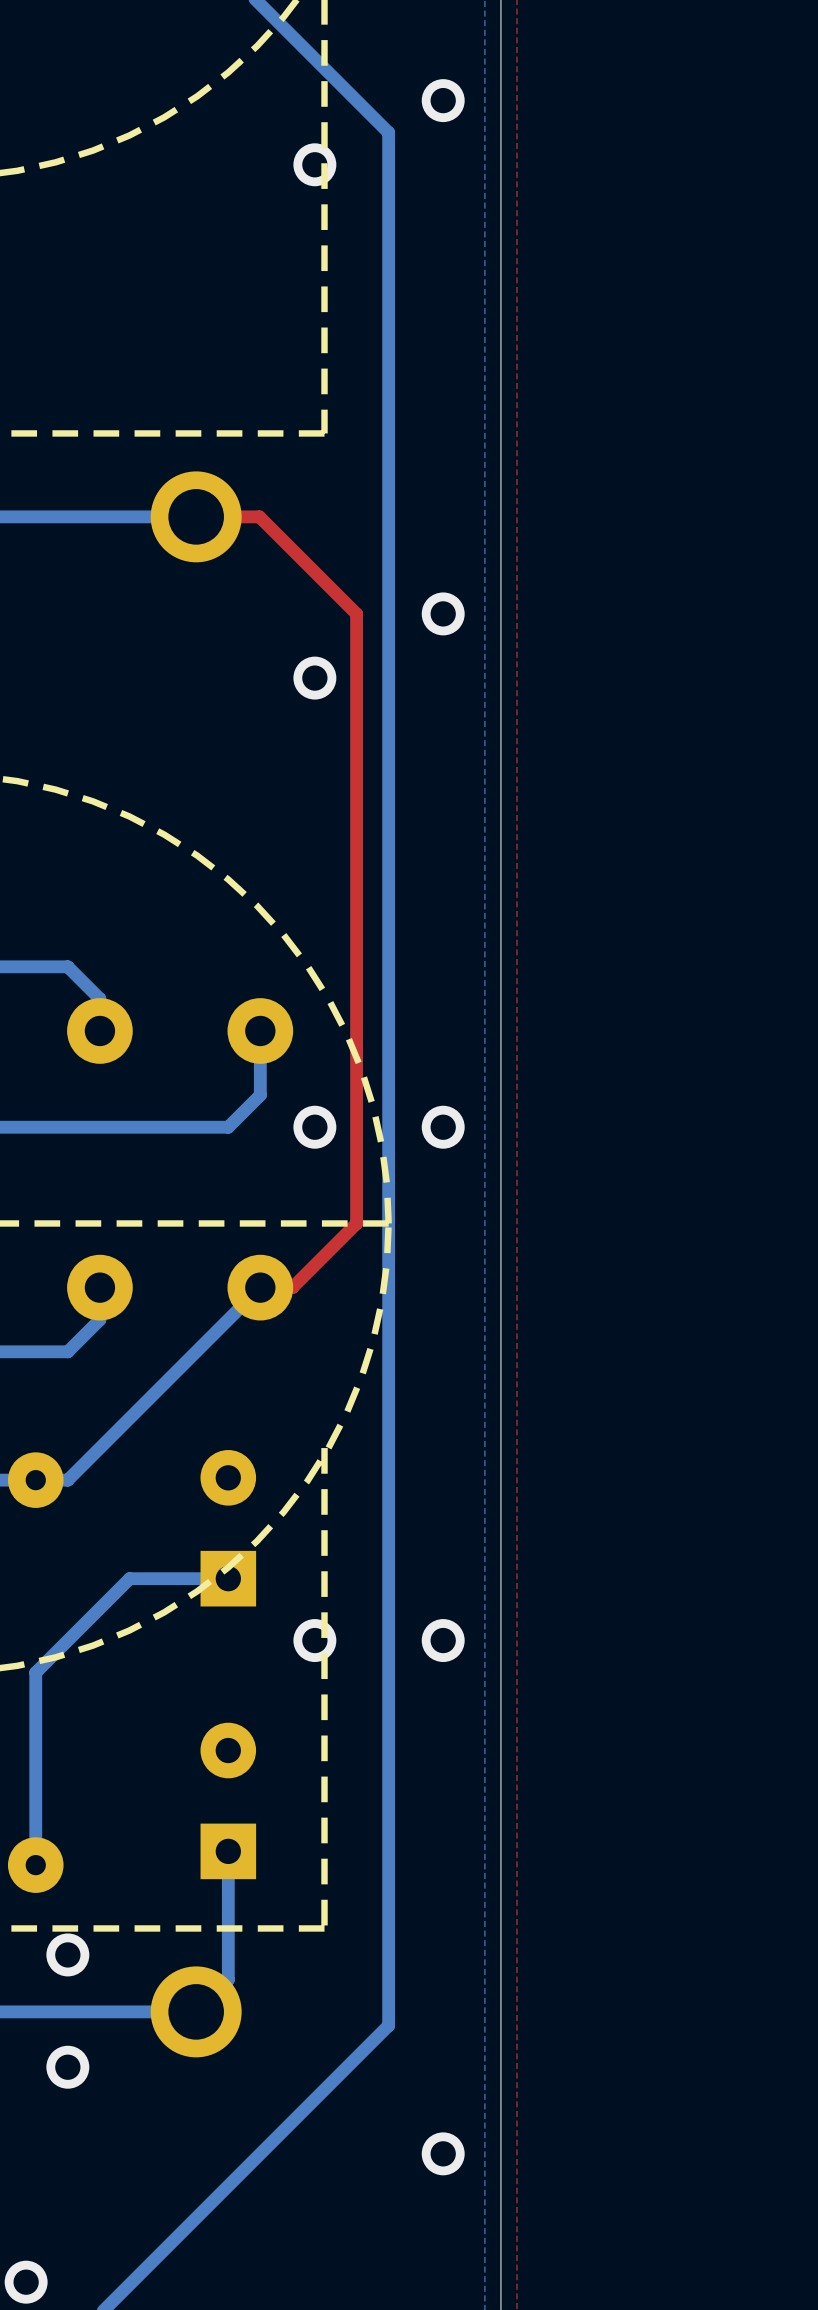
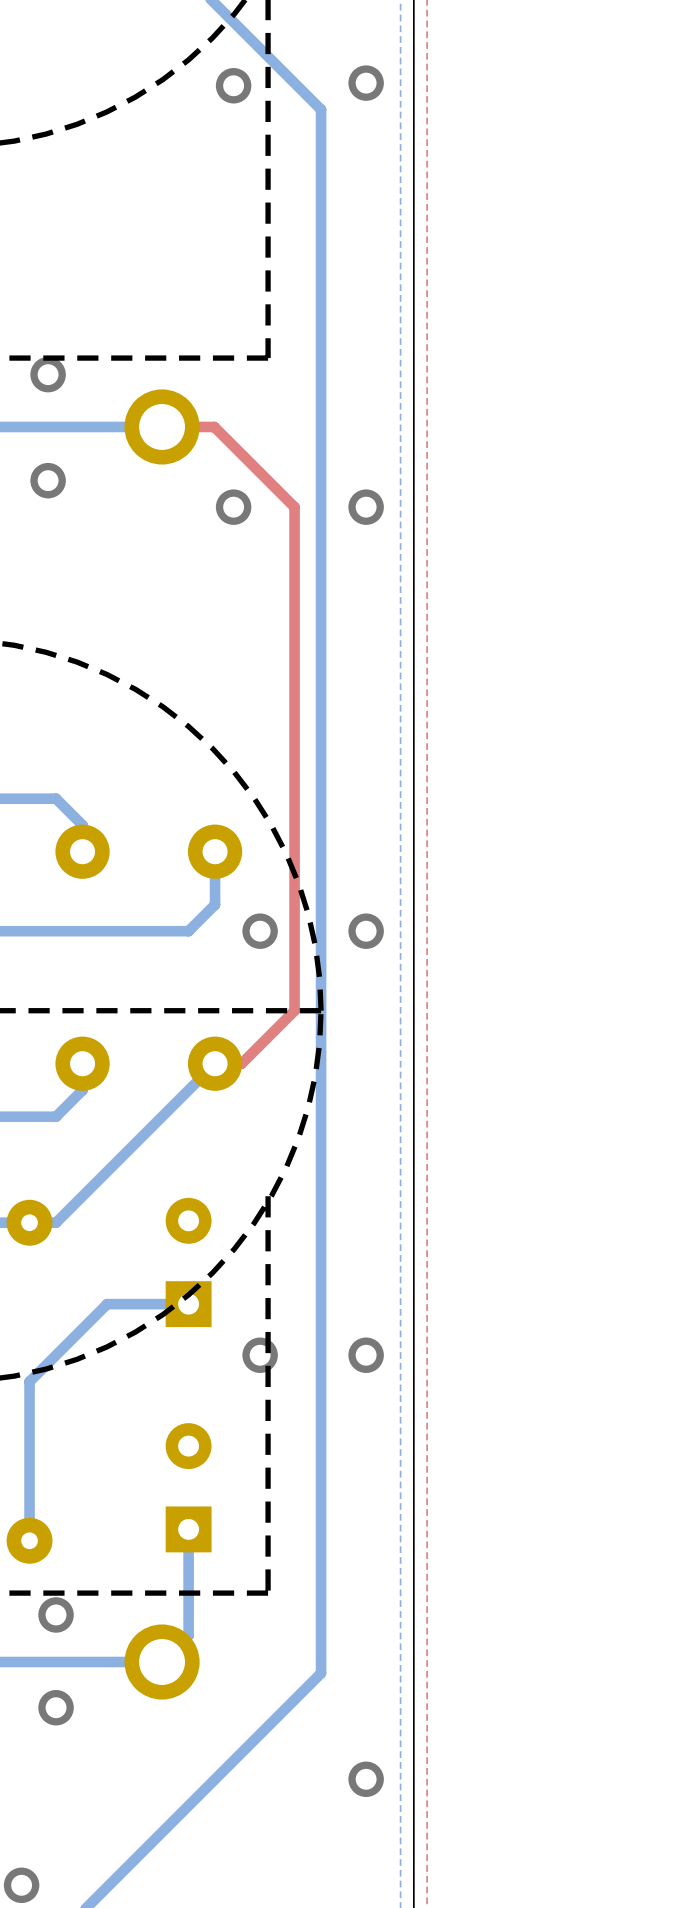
via position: (314, 164) -> (233, 85)
via: none -> (48, 374)
via: none -> (48, 480)
via position: (314, 678) -> (233, 507)

